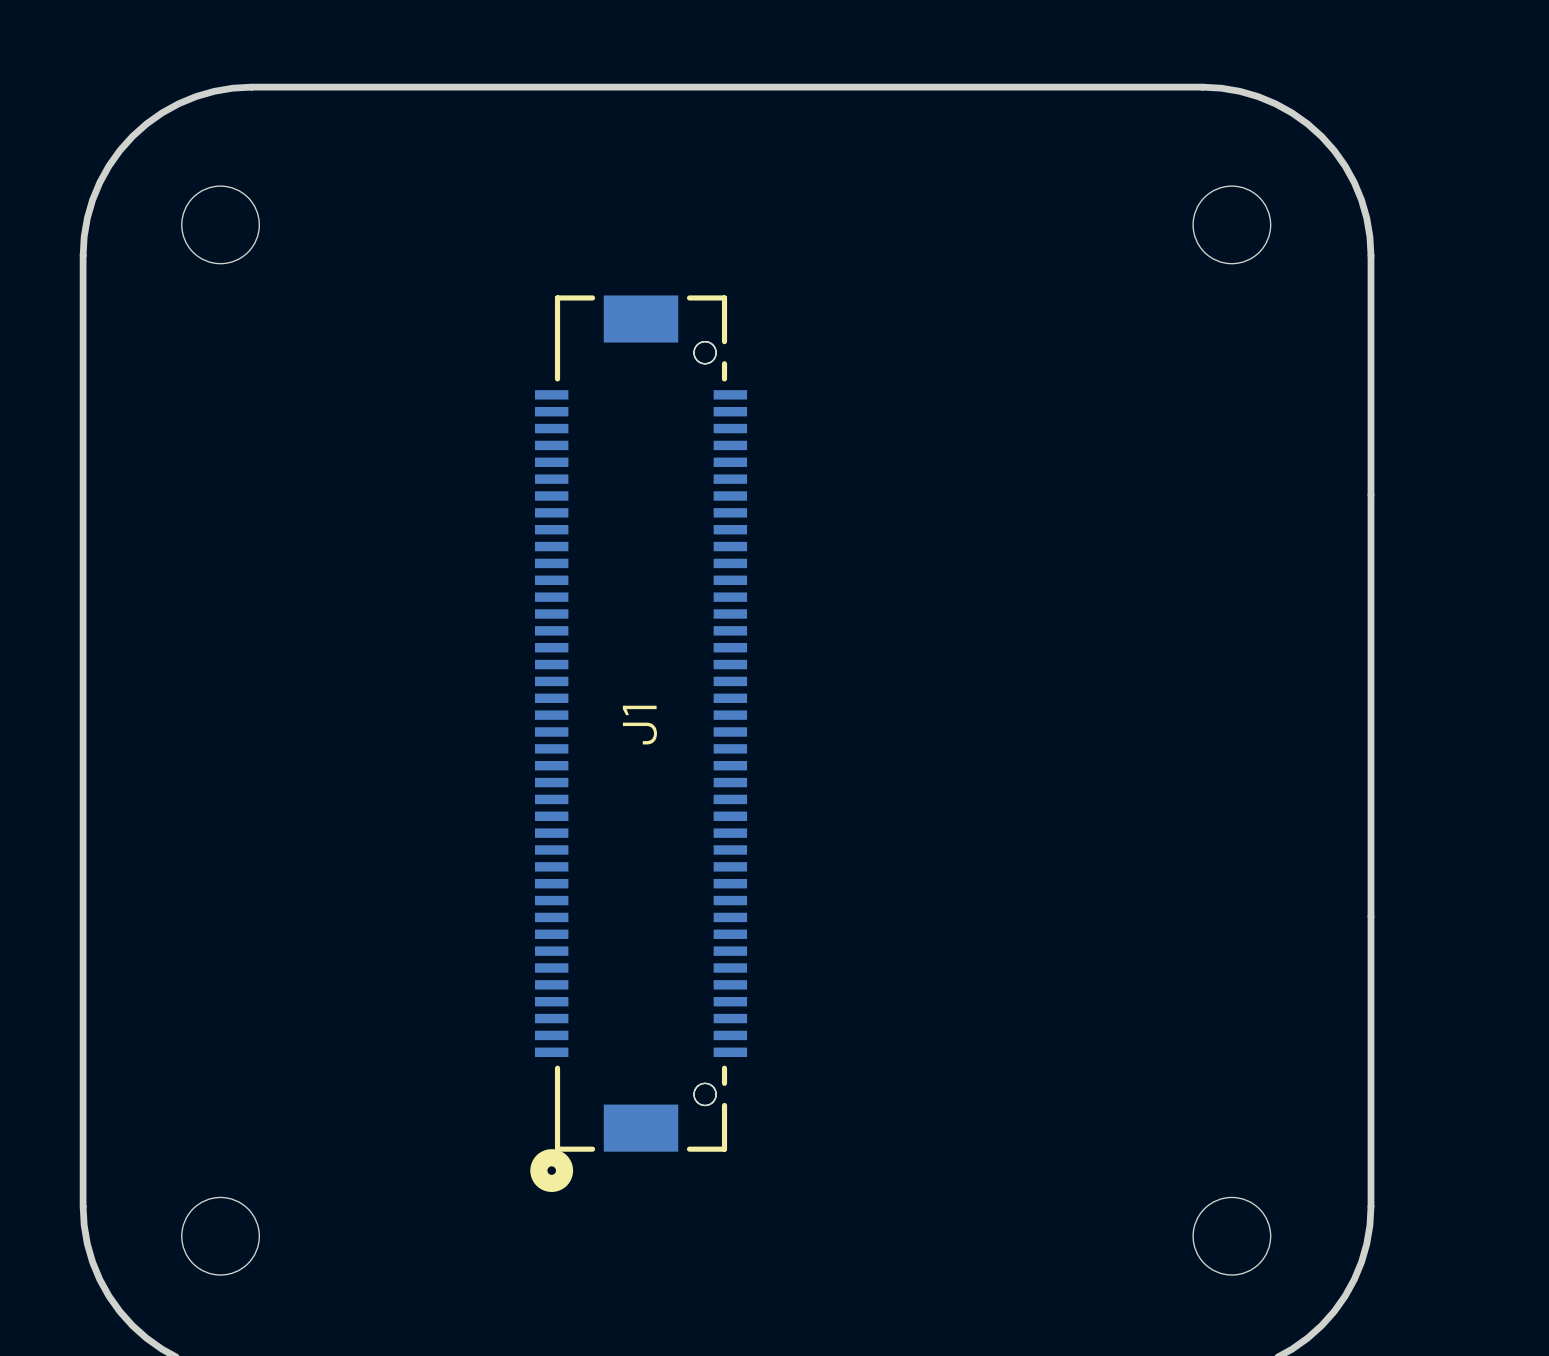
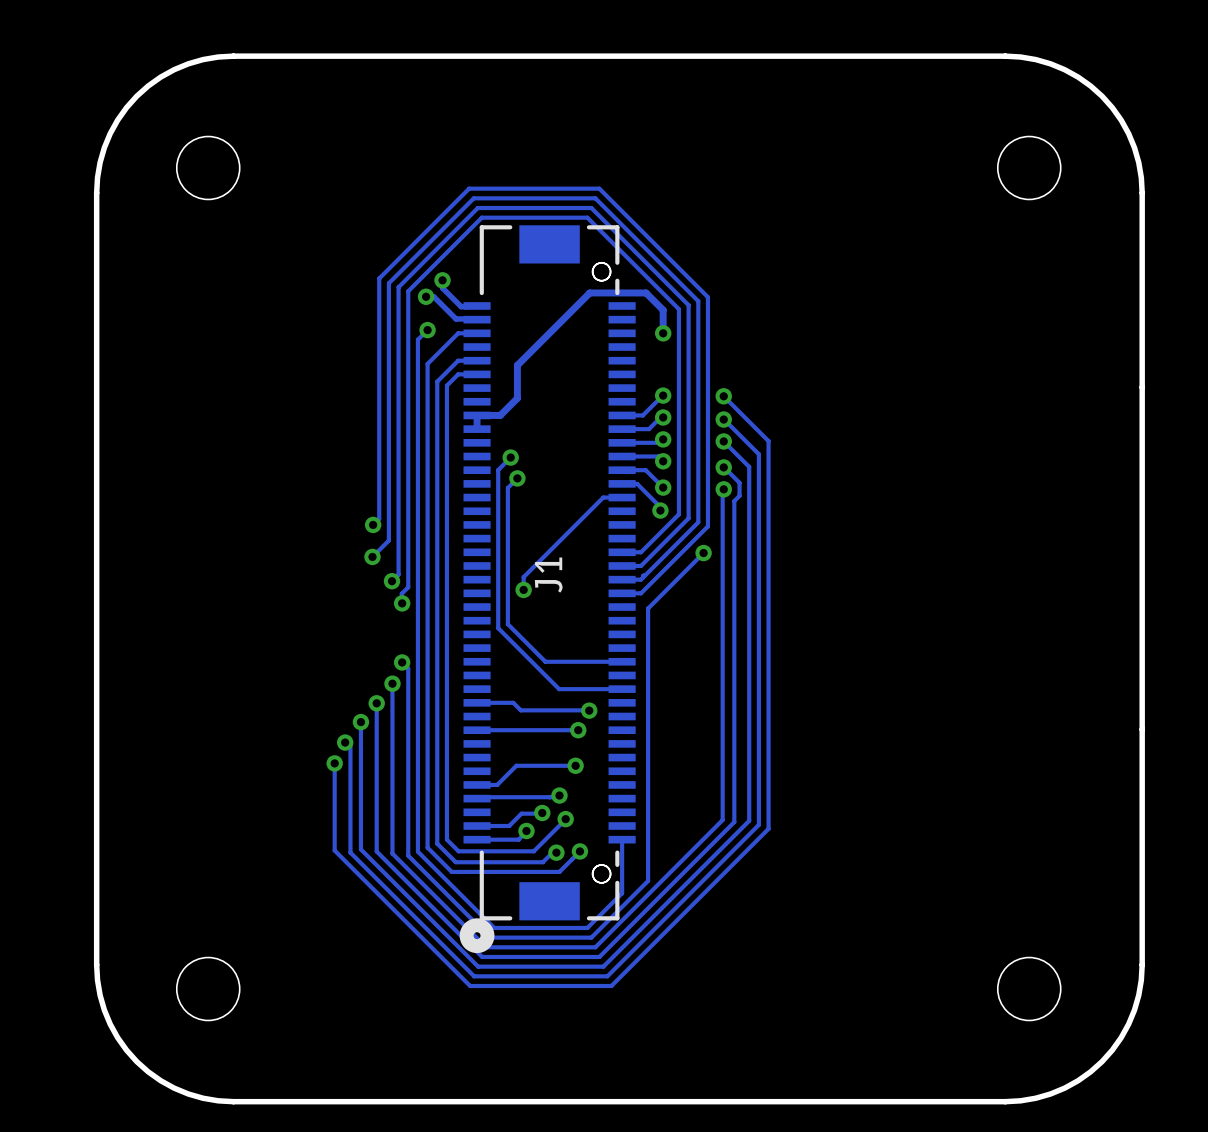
track: none -> (442, 280) (442, 288) (461, 306) (477, 305)
via: none -> (442, 280)
track: none -> (426, 296) (433, 296) (456, 318) (477, 319)
via: none -> (426, 296)
track: none -> (427, 330) (417, 339) (417, 851) (494, 927) (587, 927) (622, 893) (622, 839)
via: none -> (427, 330)
track: none -> (477, 333) (458, 333) (427, 363) (427, 847) (451, 871) (559, 871) (579, 851)
track: none -> (663, 333) (663, 310) (646, 292) (589, 292) (517, 365) (517, 398) (500, 415) (477, 415) (477, 429)
via: none -> (663, 333)
track: none -> (477, 360) (458, 360) (437, 381) (437, 843) (455, 862) (542, 862) (552, 852) (556, 852)
track: none -> (477, 374) (458, 374) (446, 385) (446, 839) (458, 851) (533, 851) (565, 819)
track: none -> (662, 395) (642, 415) (622, 415)
via: none -> (663, 395)
track: none -> (723, 396) (768, 441) (768, 828) (611, 985) (470, 985) (334, 850) (334, 763)
via: none -> (723, 396)
track: none -> (663, 417) (660, 417) (648, 429) (622, 429)
via: none -> (663, 417)
via: none -> (723, 419)
track: none -> (724, 419) (758, 454) (758, 824) (607, 976) (474, 976) (350, 852) (350, 743) (345, 742)
track: none -> (663, 439) (659, 442) (622, 442)
via: none -> (663, 439)
track: none -> (723, 441) (749, 466) (749, 820) (603, 966) (478, 966) (360, 849) (360, 722)
via: none -> (723, 441)
track: none -> (622, 456) (658, 456) (663, 461)
track: none -> (510, 457) (498, 470) (498, 628) (559, 689) (622, 689)
via: none -> (510, 457)
via: none -> (663, 461)
via: none -> (723, 467)
track: none -> (724, 467) (739, 482) (739, 495) (734, 501) (734, 822) (599, 956) (482, 956) (376, 851) (376, 703)
track: none -> (622, 470) (645, 470) (663, 487)
track: none -> (517, 478) (507, 487) (507, 624) (545, 661) (622, 661)
via: none -> (517, 478)
track: none -> (622, 483) (637, 483) (660, 507) (660, 510)
via: none -> (663, 487)
track: none -> (723, 489) (722, 820) (595, 947) (486, 947) (392, 853) (392, 683)
via: none -> (723, 489)
track: none -> (622, 497) (603, 497) (523, 577) (523, 589)
via: none -> (660, 510)
track: none -> (373, 524) (379, 518) (379, 278) (469, 188) (599, 188) (707, 297) (707, 526) (640, 593) (622, 593)
via: none -> (373, 524)
track: none -> (622, 552) (640, 552) (678, 514) (678, 309) (587, 217) (481, 217) (408, 291) (408, 587) (401, 593) (401, 603)
track: none -> (703, 553) (648, 608) (648, 880) (591, 937) (490, 937) (408, 855) (408, 668) (402, 662)
via: none -> (703, 553)
track: none -> (372, 556) (388, 540) (388, 283) (473, 198) (595, 198) (698, 301) (698, 522) (640, 579) (622, 579)
via: none -> (372, 556)
track: none -> (622, 565) (640, 565) (688, 518) (688, 305) (591, 208) (477, 208) (398, 287) (398, 574) (392, 581)
via: none -> (392, 581)
via: none -> (523, 589)
via: none -> (402, 603)
via: none -> (402, 662)
via: none -> (392, 683)
track: none -> (477, 702) (513, 702) (520, 710) (588, 710)
via: none -> (376, 703)
via: none -> (589, 710)
via: none -> (360, 722)
track: none -> (578, 730) (477, 730)
via: none -> (578, 730)
via: none -> (345, 742)
via: none -> (334, 763)
track: none -> (575, 765) (516, 765) (497, 784) (477, 784)
via: none -> (575, 765)
track: none -> (559, 795) (557, 797) (477, 798)
via: none -> (559, 795)
track: none -> (542, 812) (521, 813) (509, 825) (477, 825)
via: none -> (542, 812)
via: none -> (565, 819)
track: none -> (526, 831) (518, 839) (477, 839)
via: none -> (526, 831)
via: none -> (579, 851)
via: none -> (556, 852)

